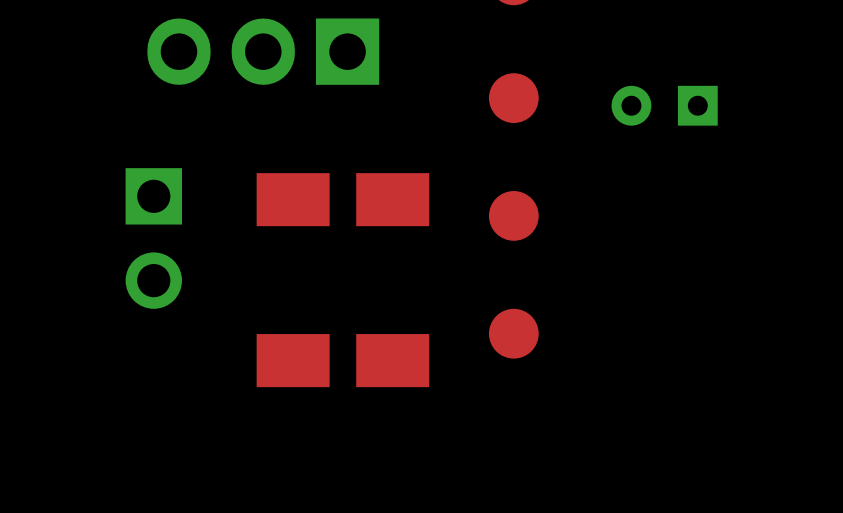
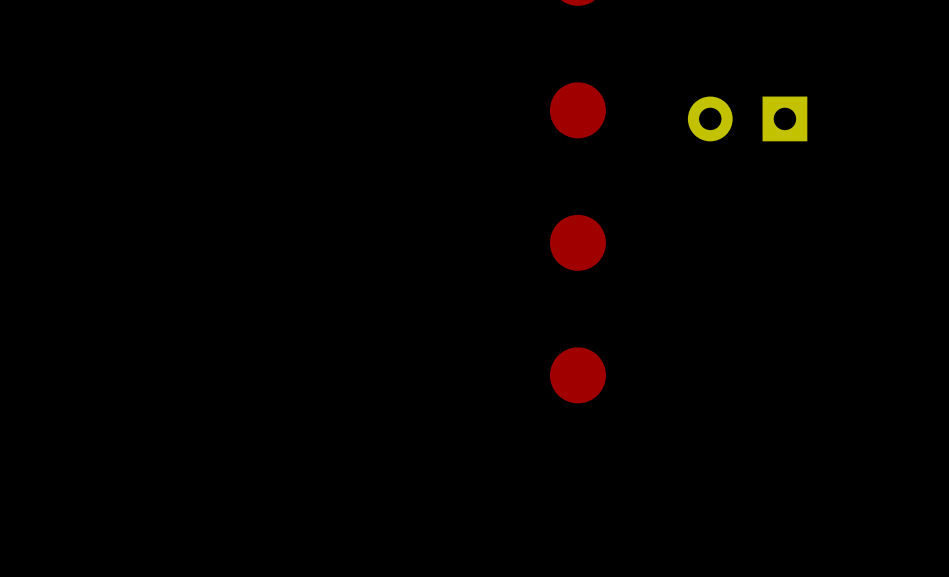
part: (263, 51) -> none
part: (342, 199) -> none
part: (153, 238) -> none
part: (342, 360) -> none

